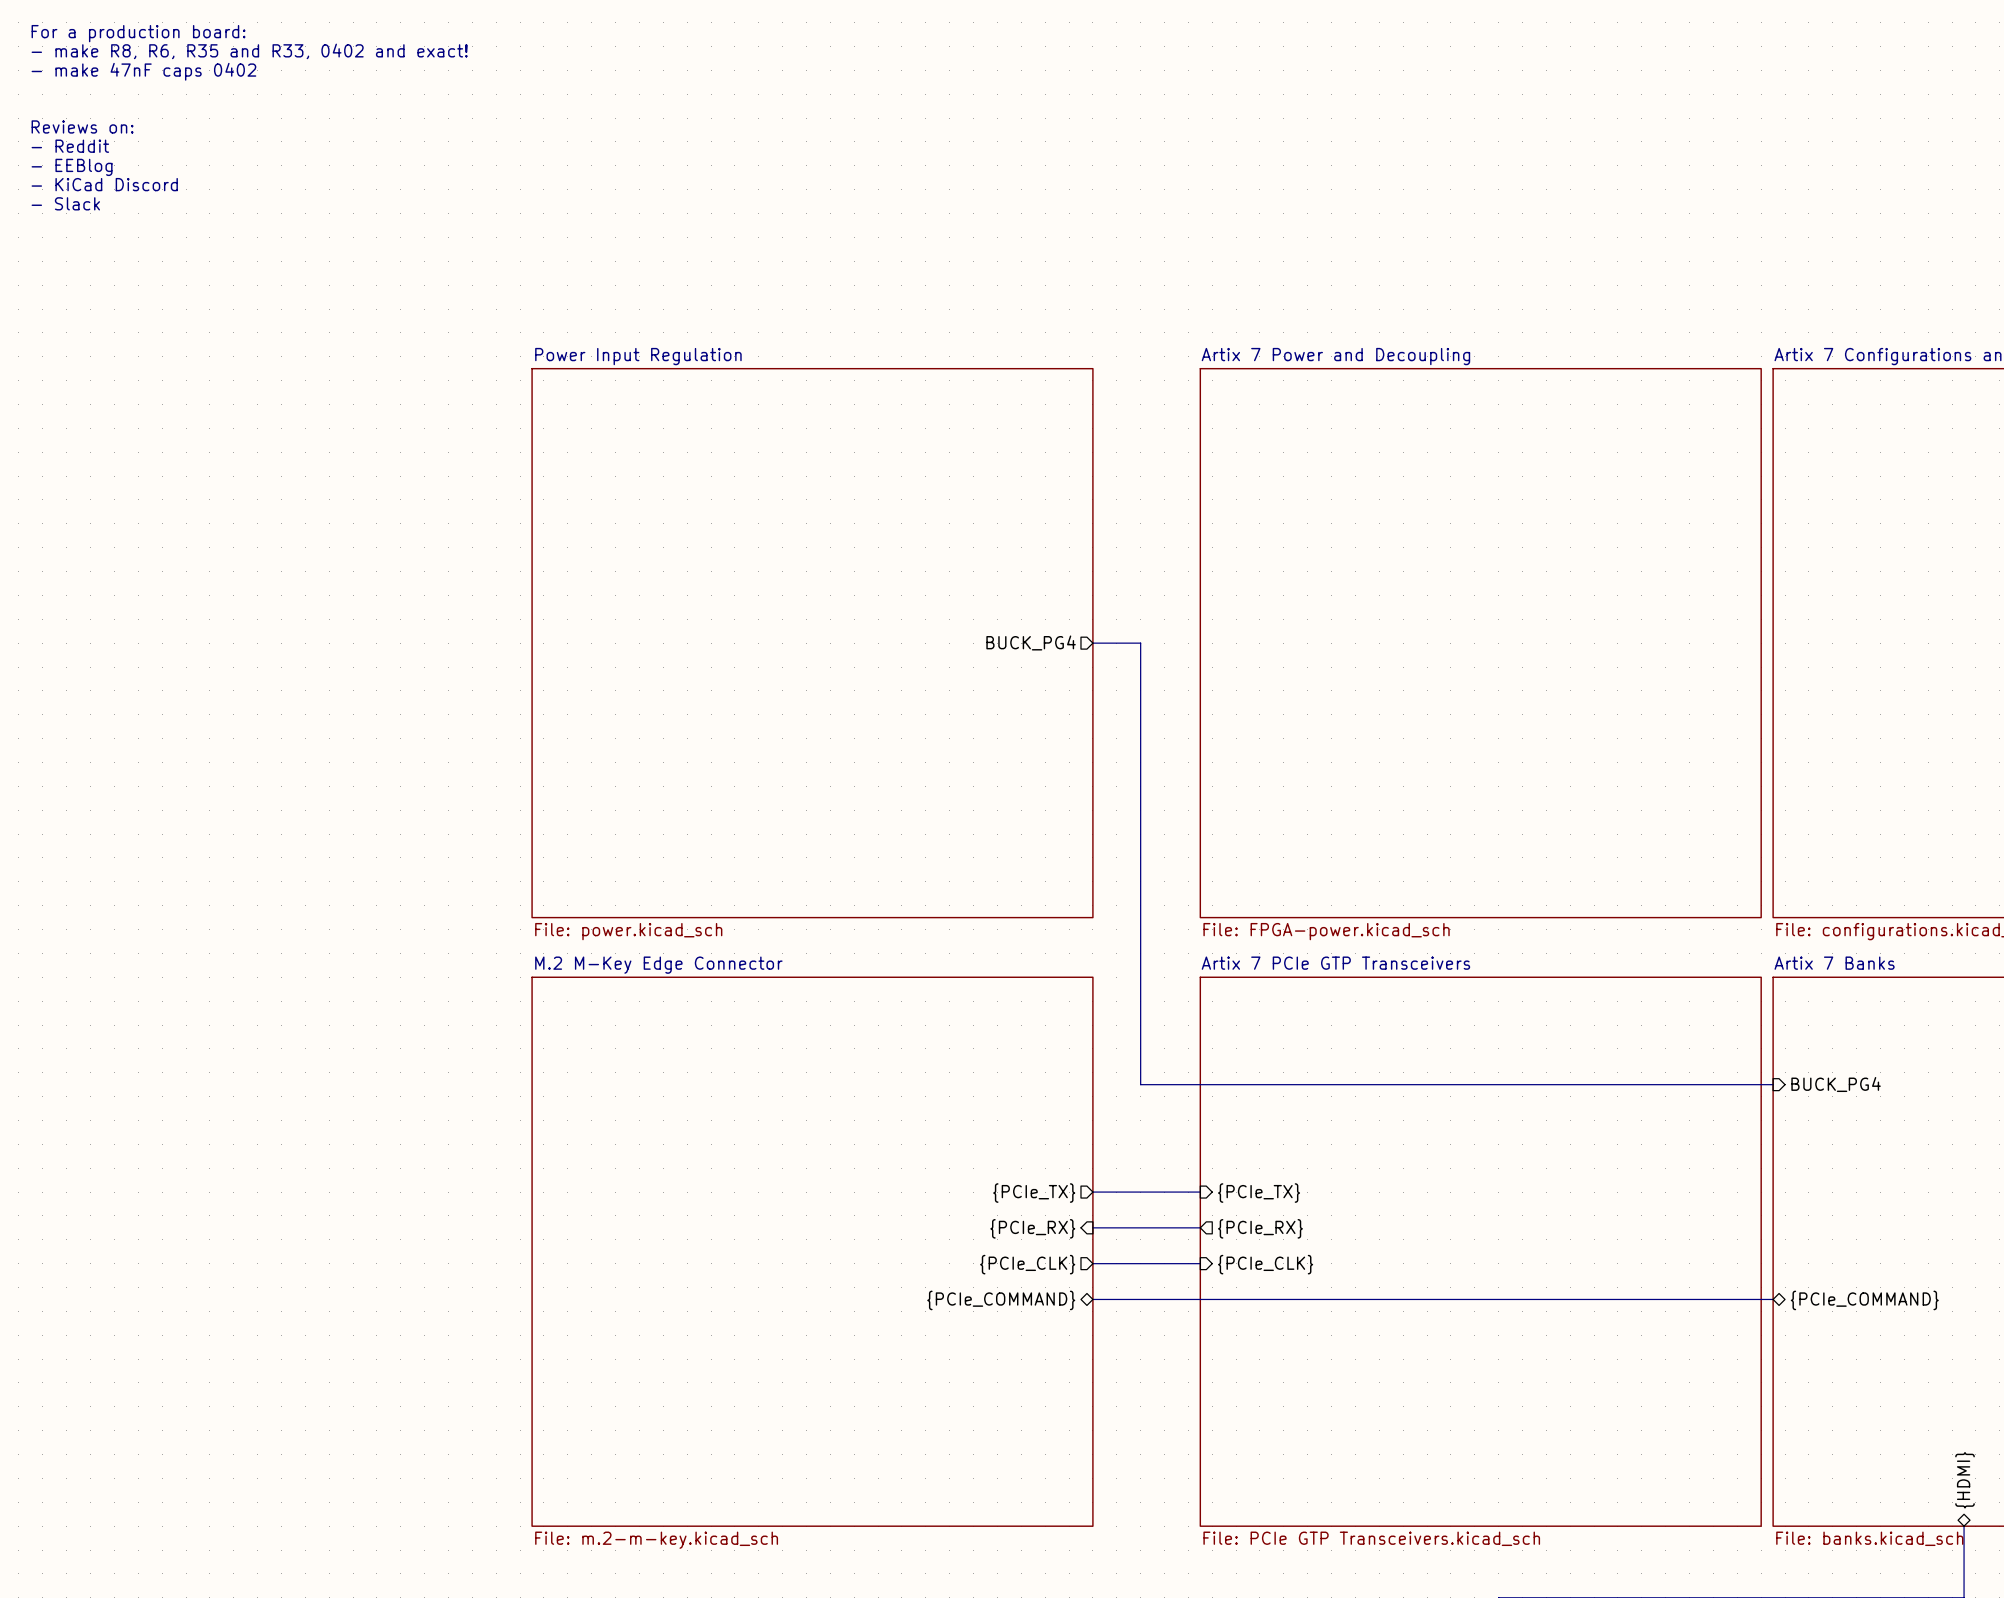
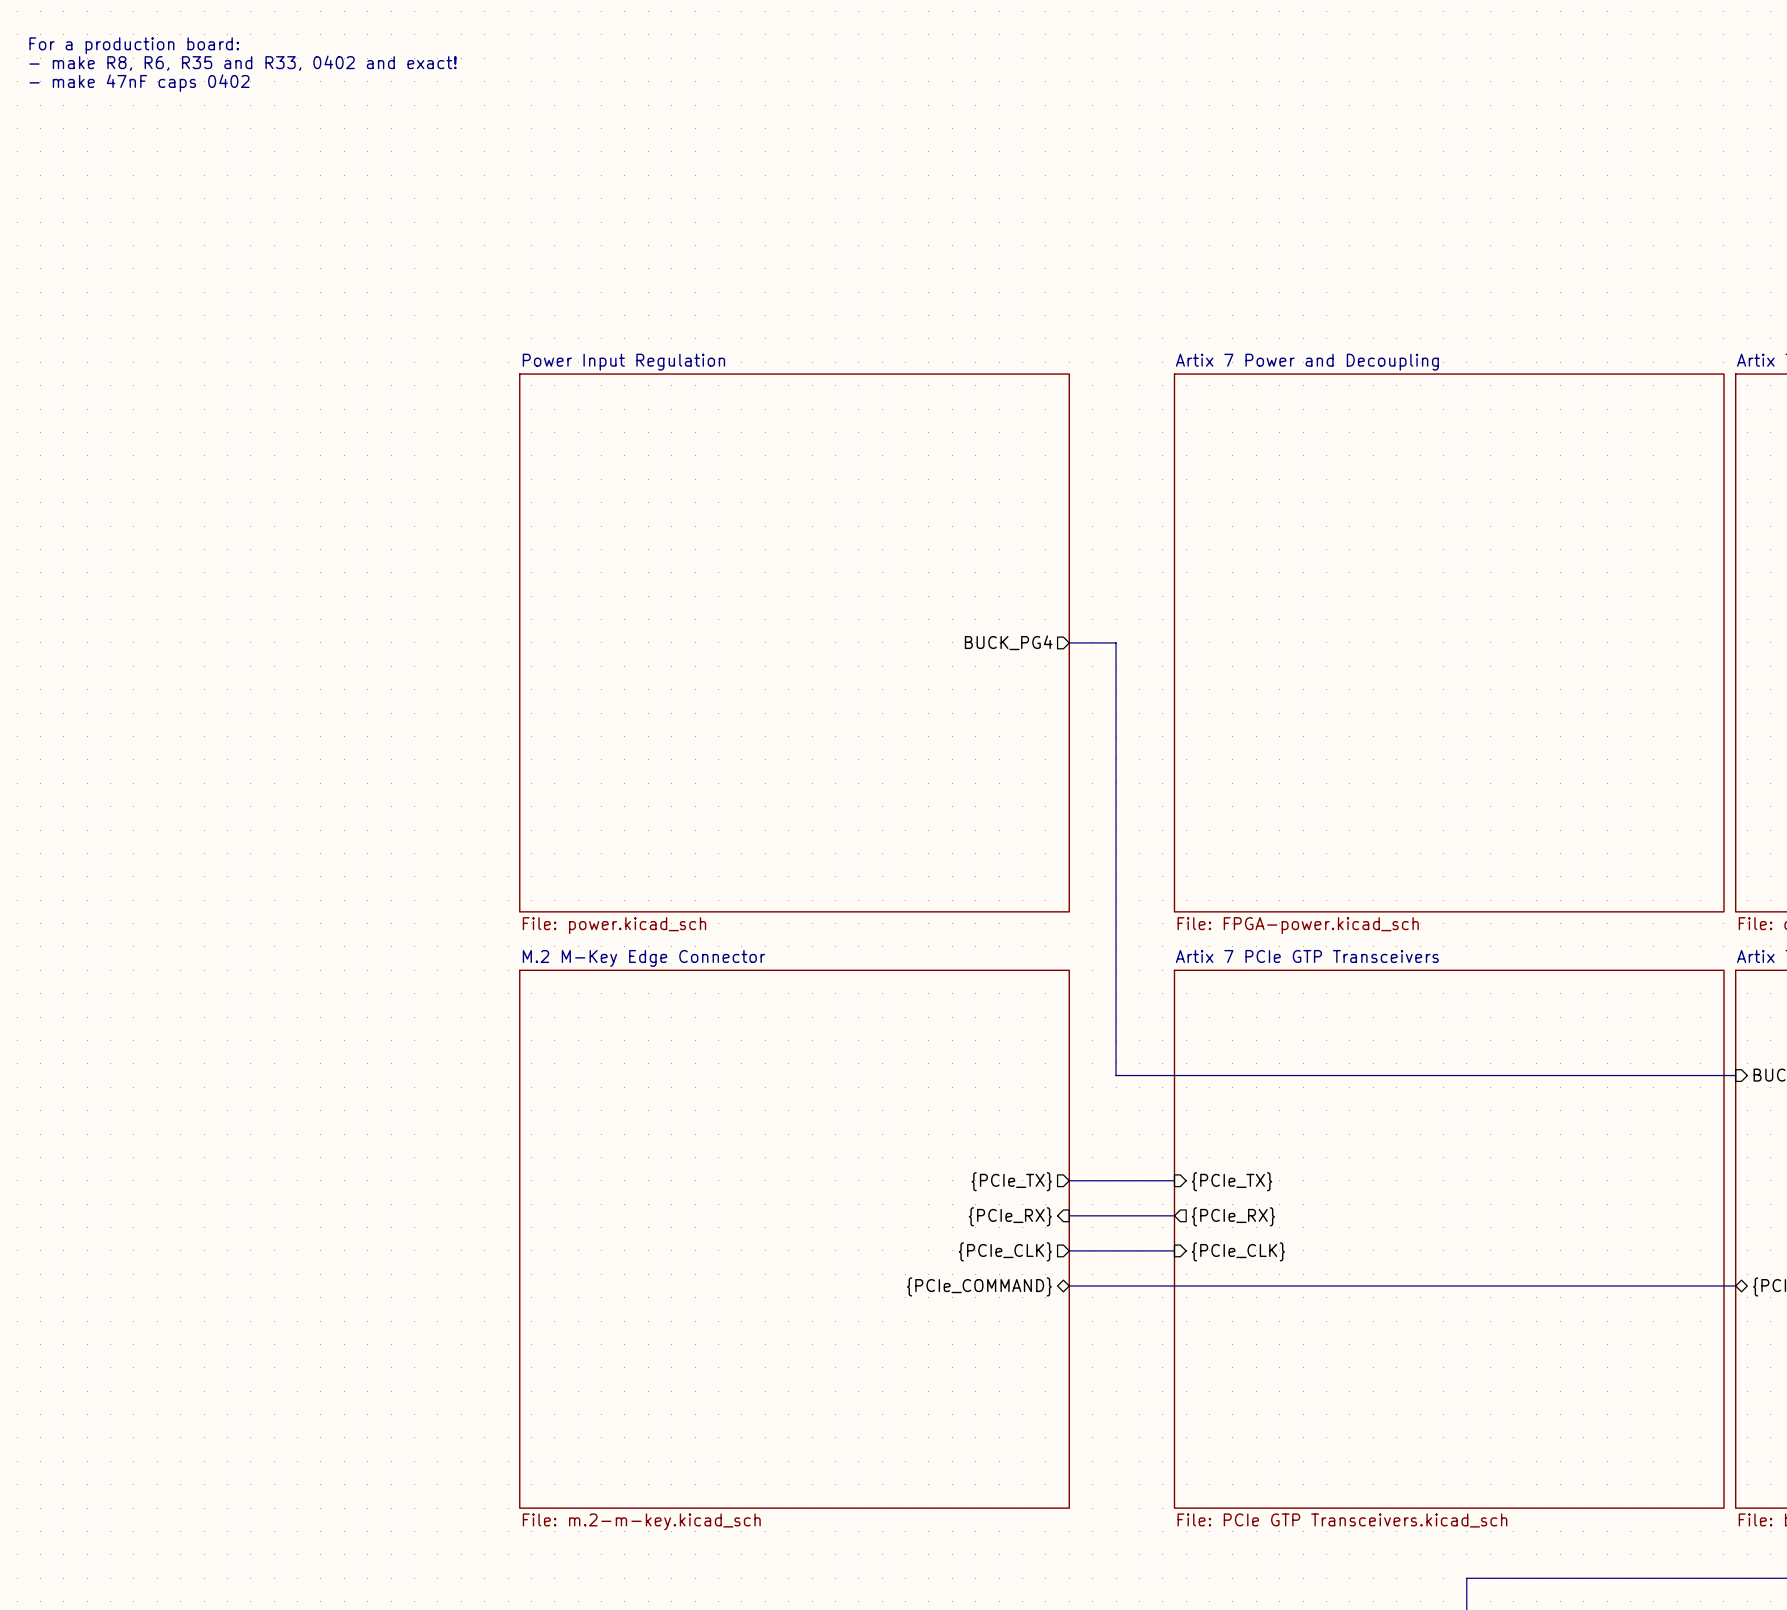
text: Reviews on: (82, 126) -> none
text: - Reddit (70, 146) -> none
text: - EEBlog (72, 167) -> none
text: - KiCad Discord (104, 184) -> none
text: - Slack (65, 203) -> none

